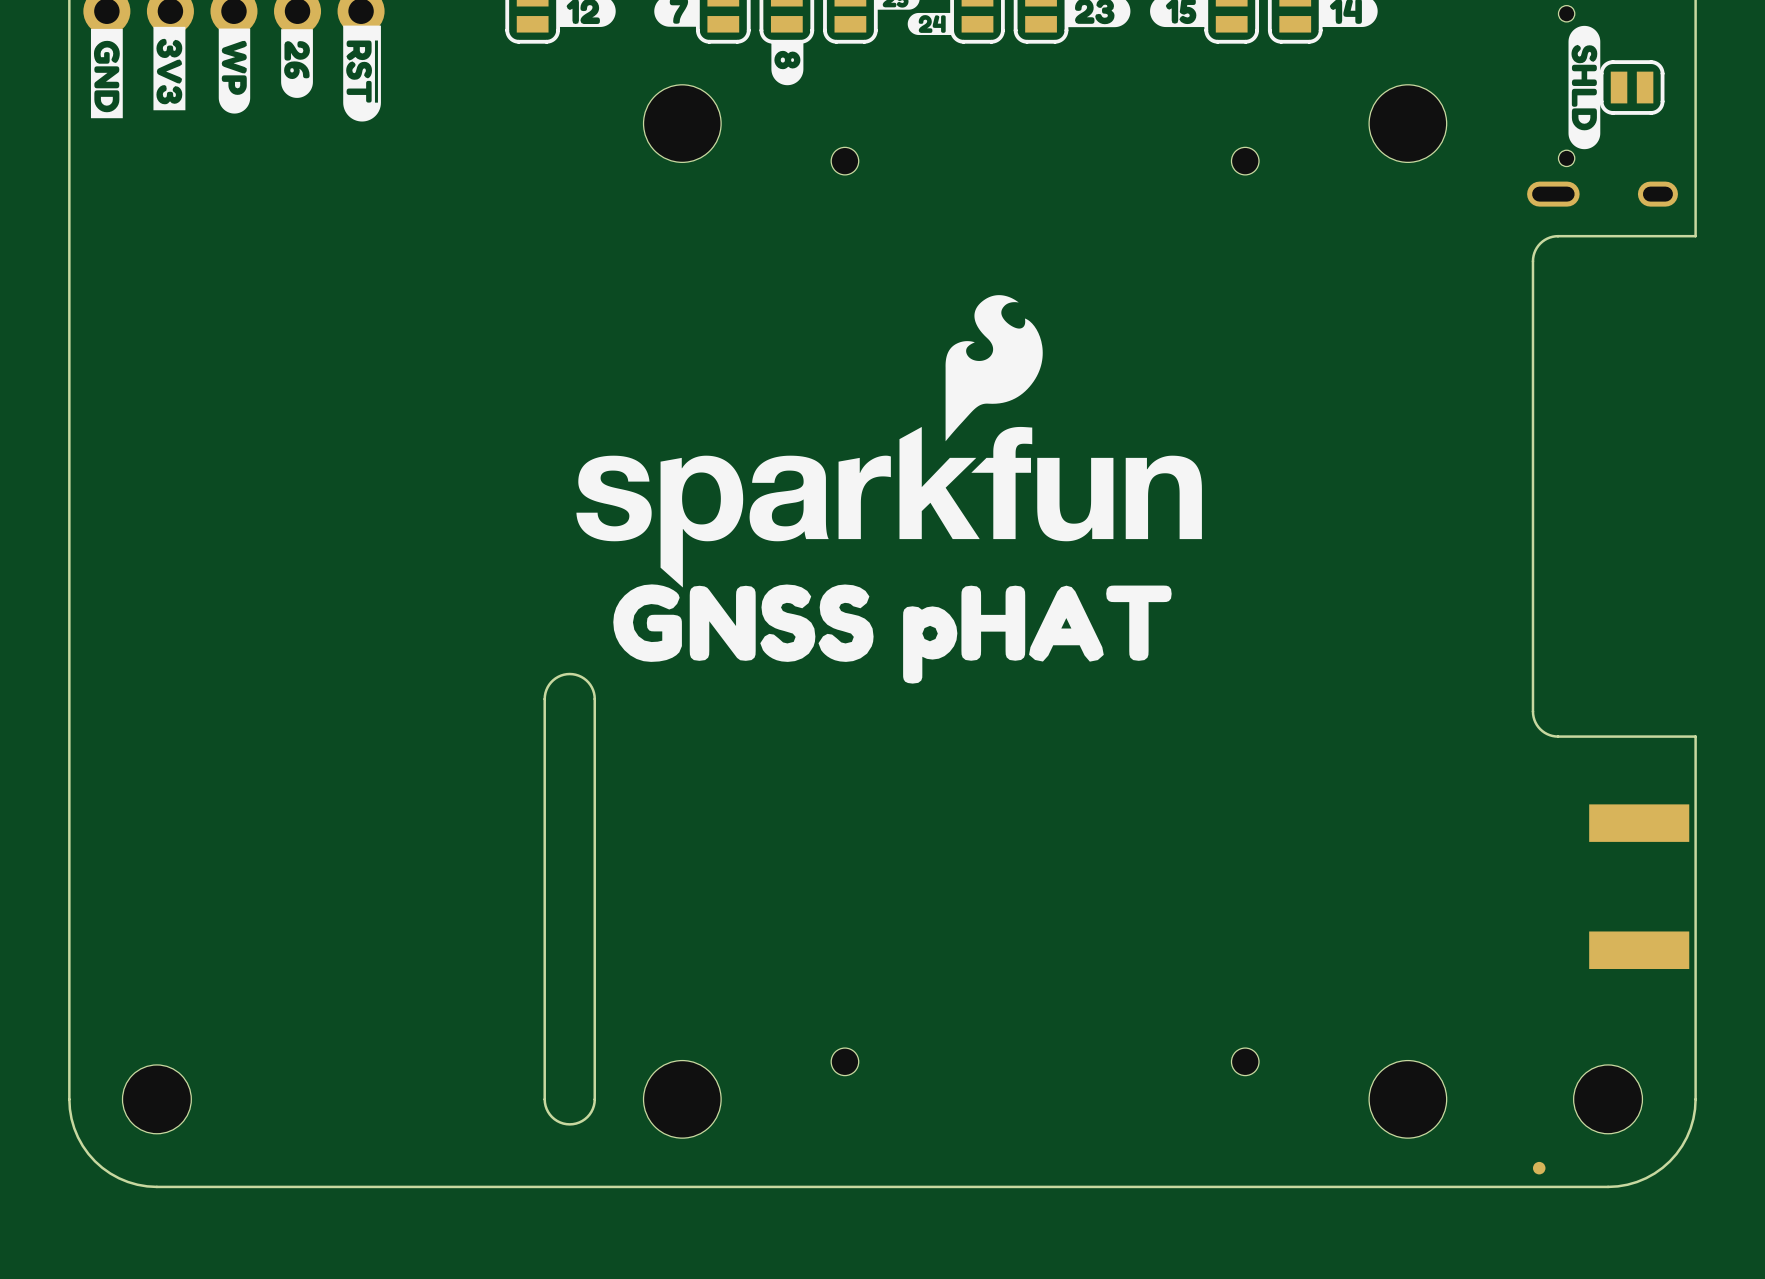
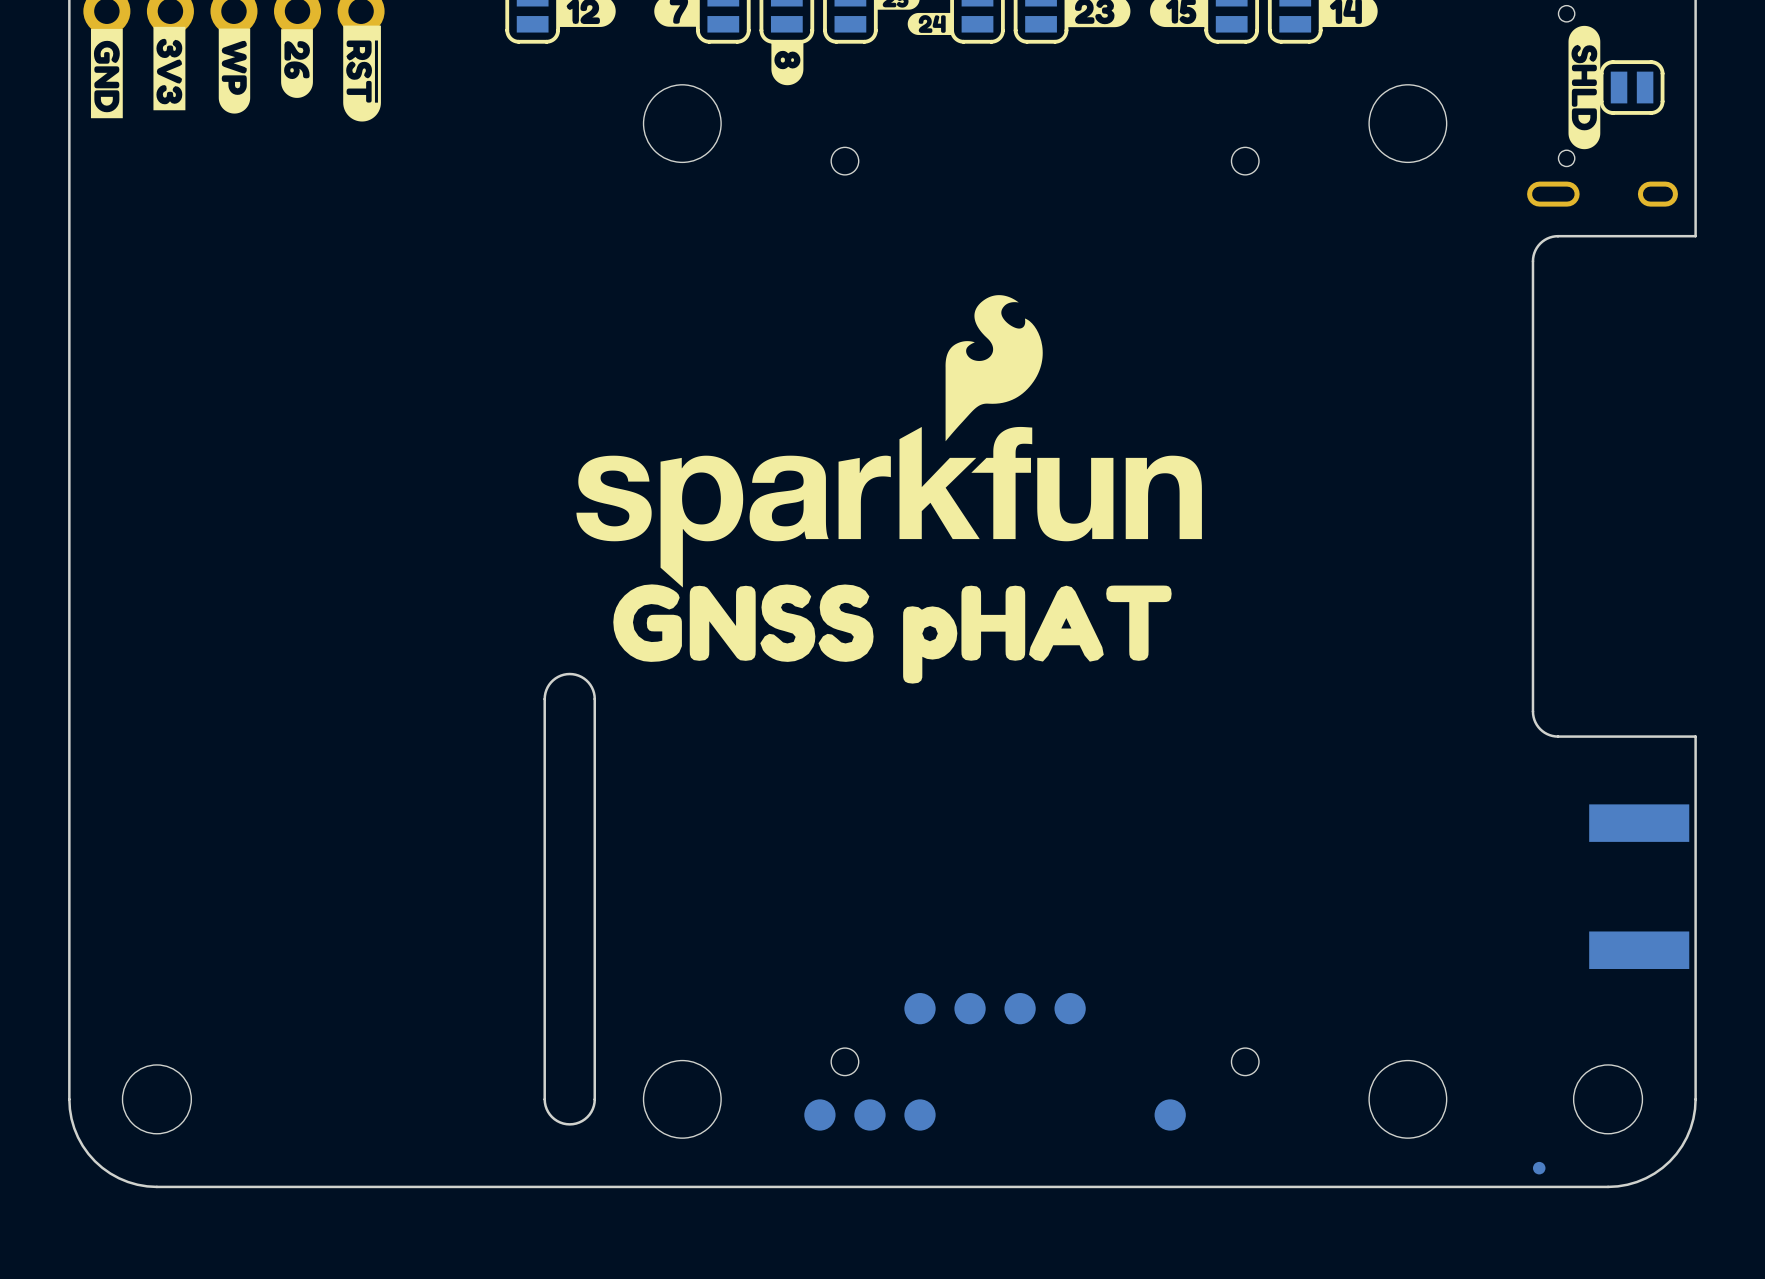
part: none -> (920, 1008)
part: none -> (970, 1008)
part: none -> (1020, 1008)
part: none -> (1070, 1008)
part: none -> (819, 1114)
part: none -> (869, 1114)
part: none -> (920, 1114)
part: none -> (1170, 1114)

